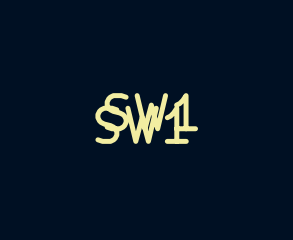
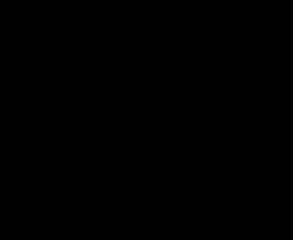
drawing: [95, 93, 199, 144] -> none

